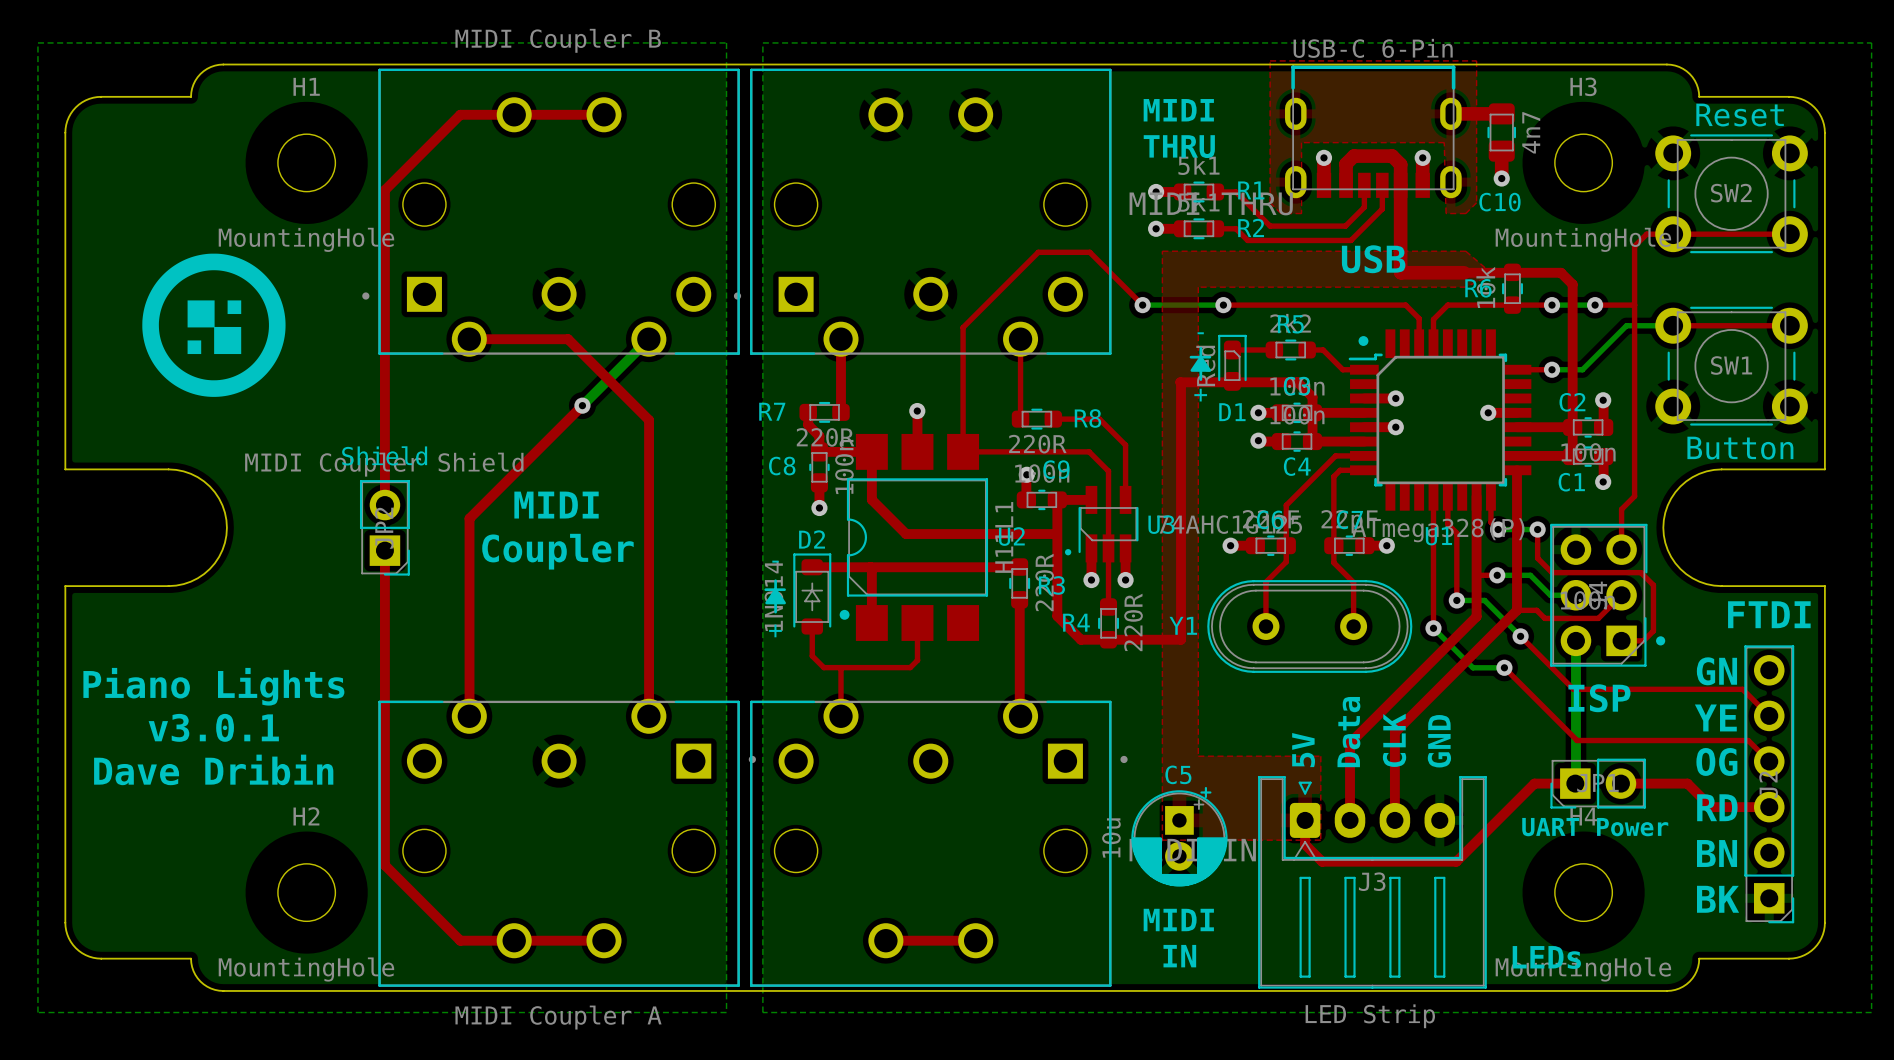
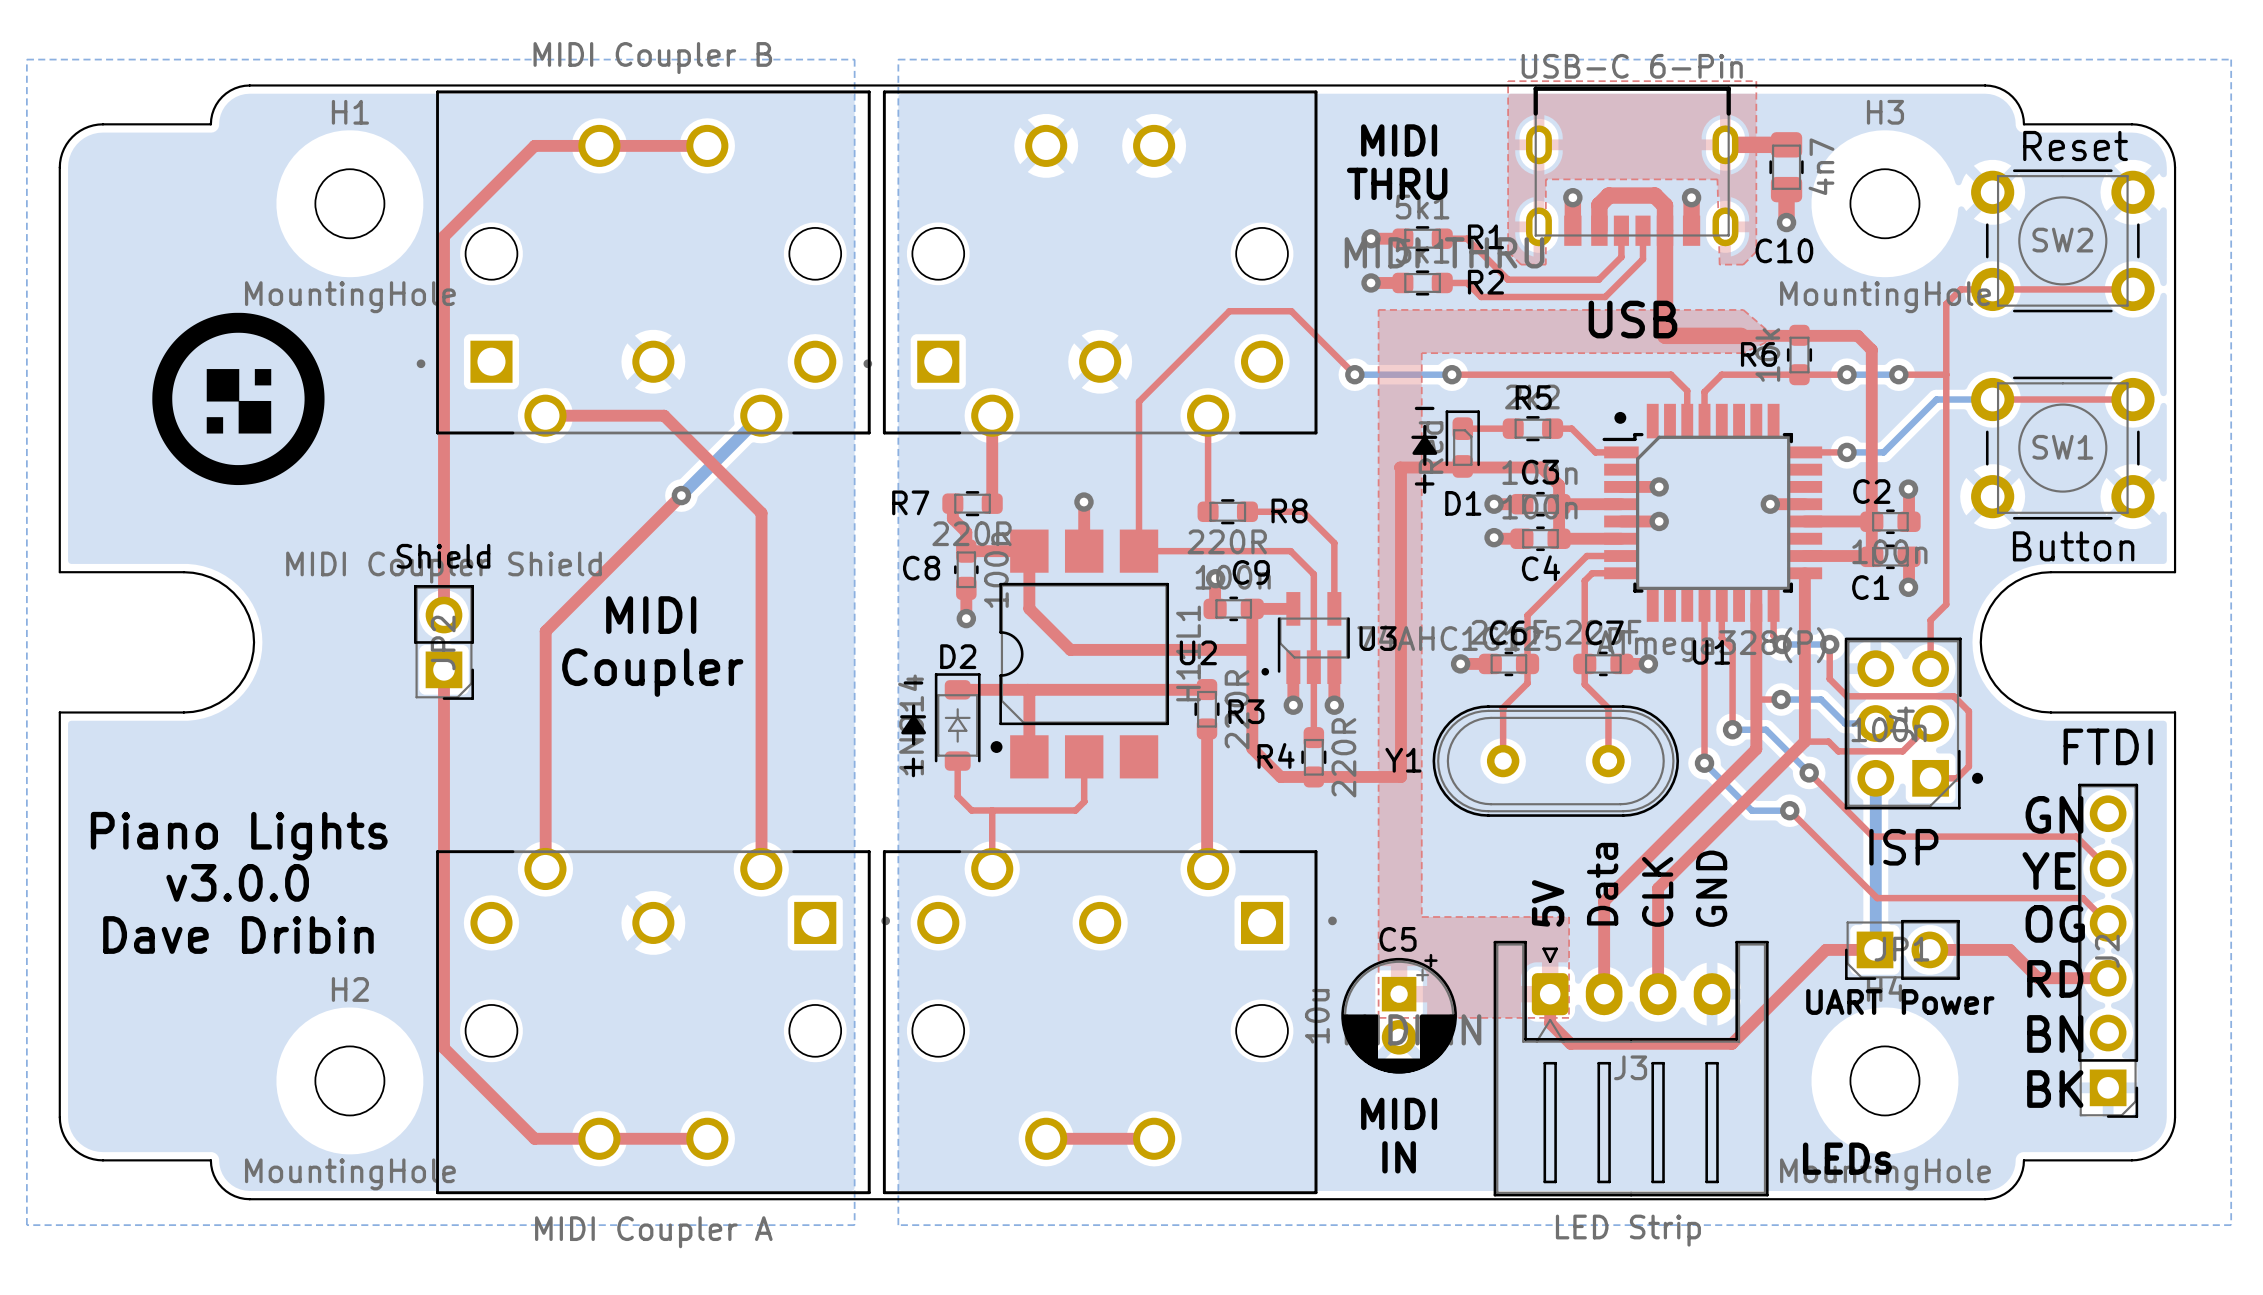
text: v3.0.1 (213, 727) -> v3.0.0 (237, 882)

